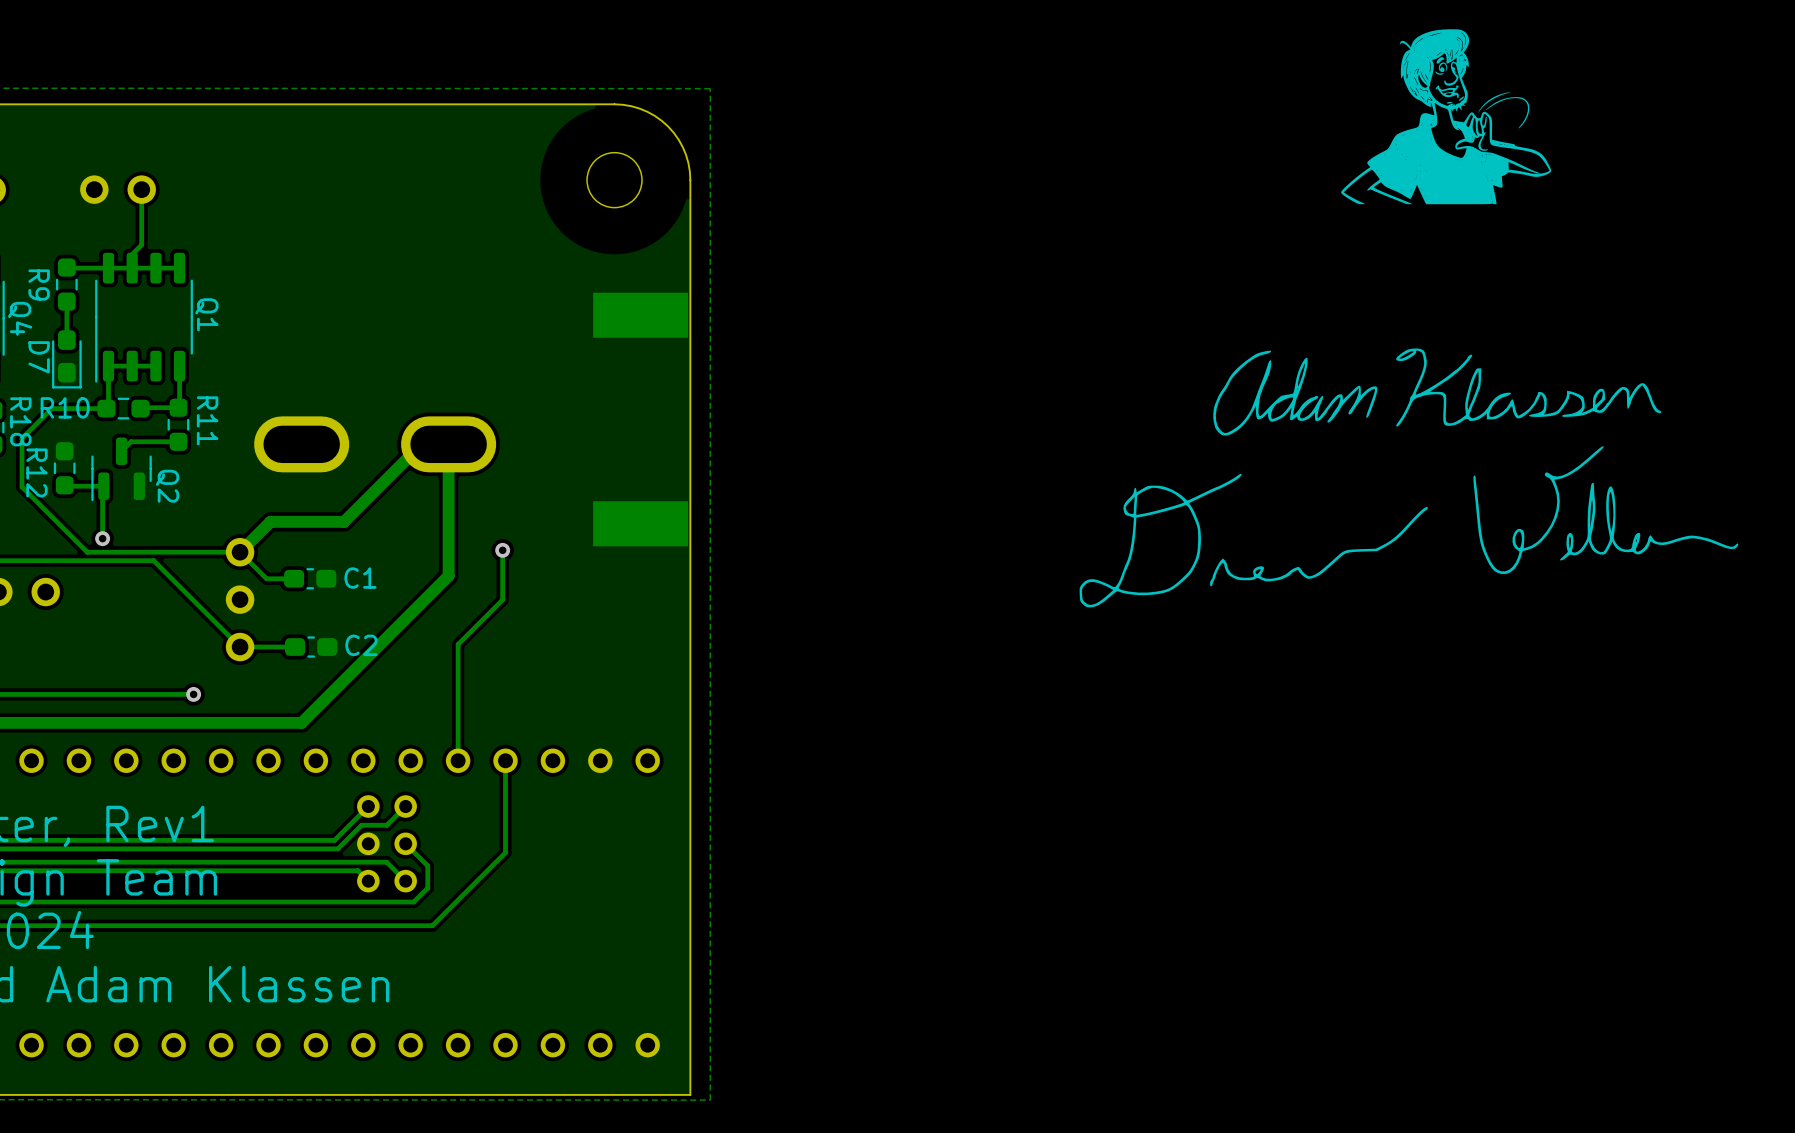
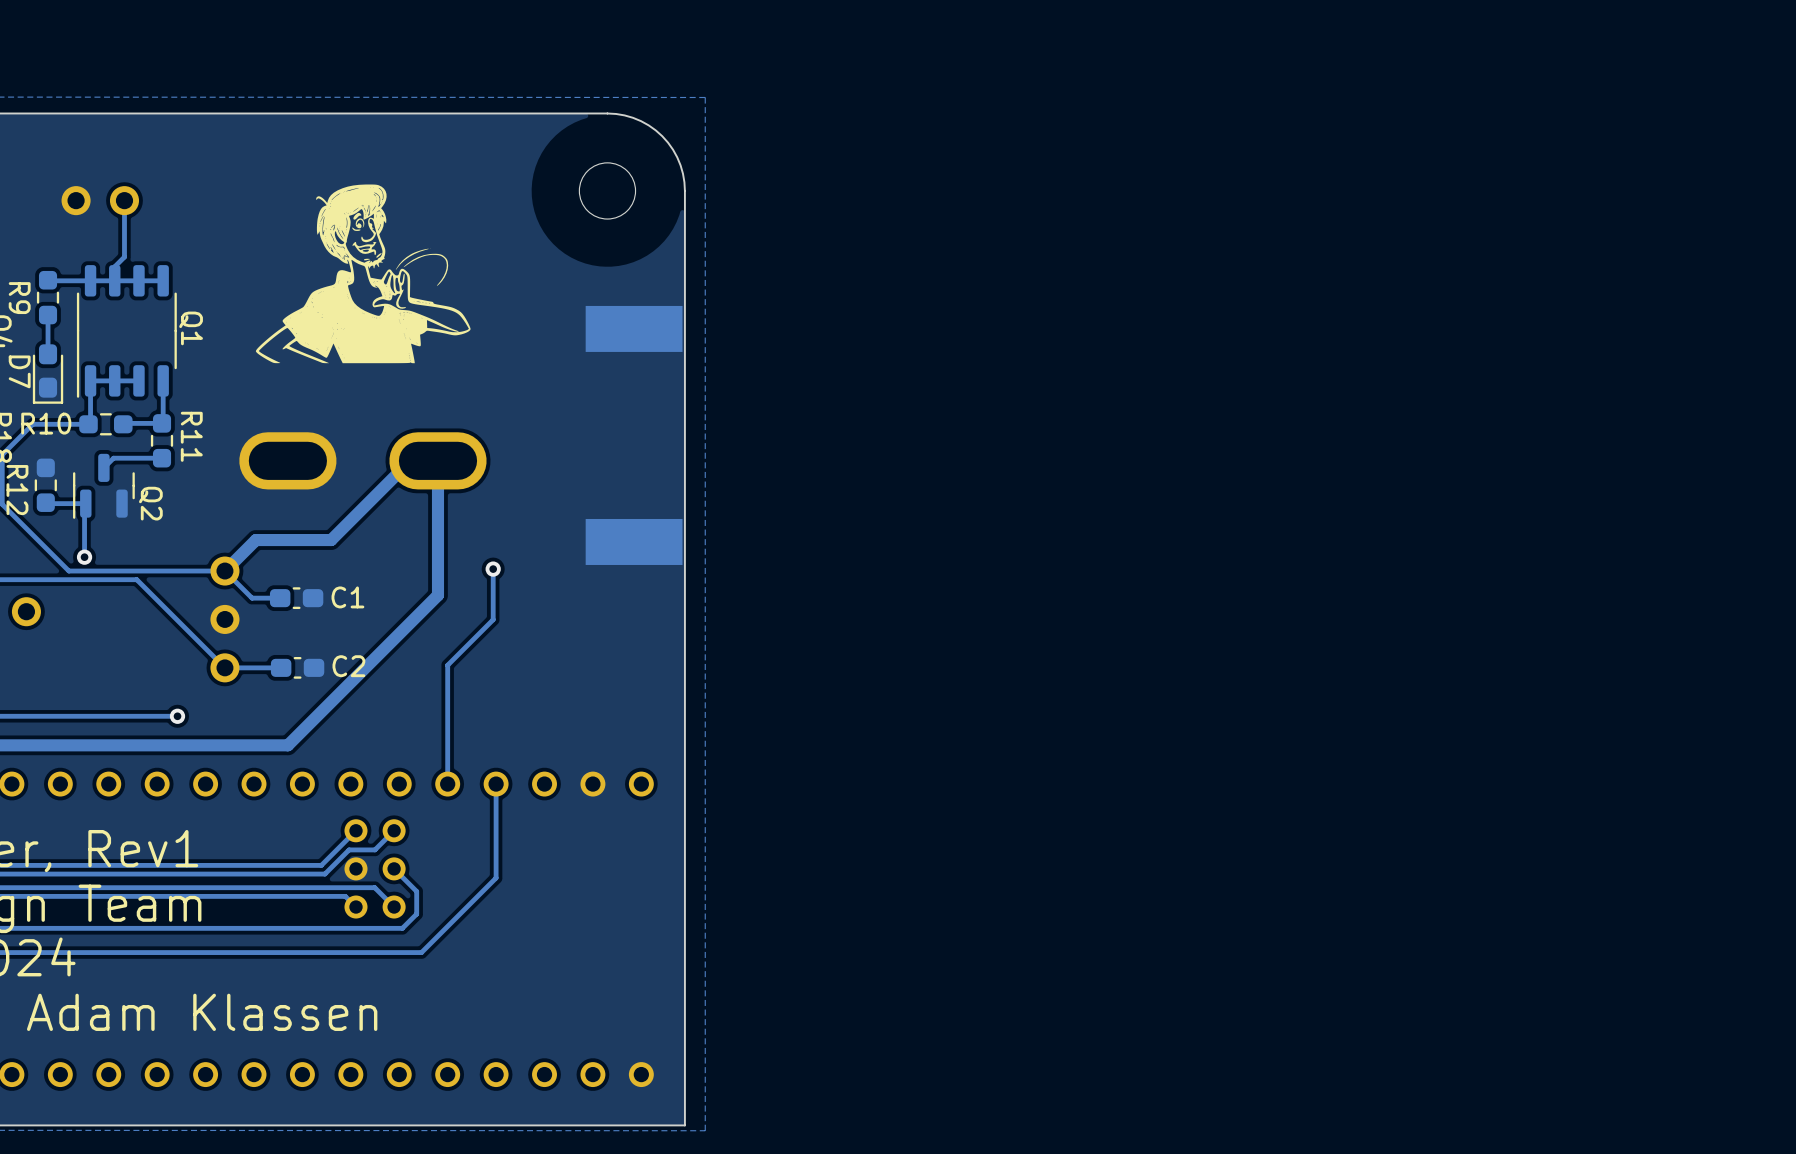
drawing: [1341, 29, 1552, 205] -> none
drawing: none -> [255, 184, 471, 364]
drawing: [1079, 348, 1739, 608] -> none

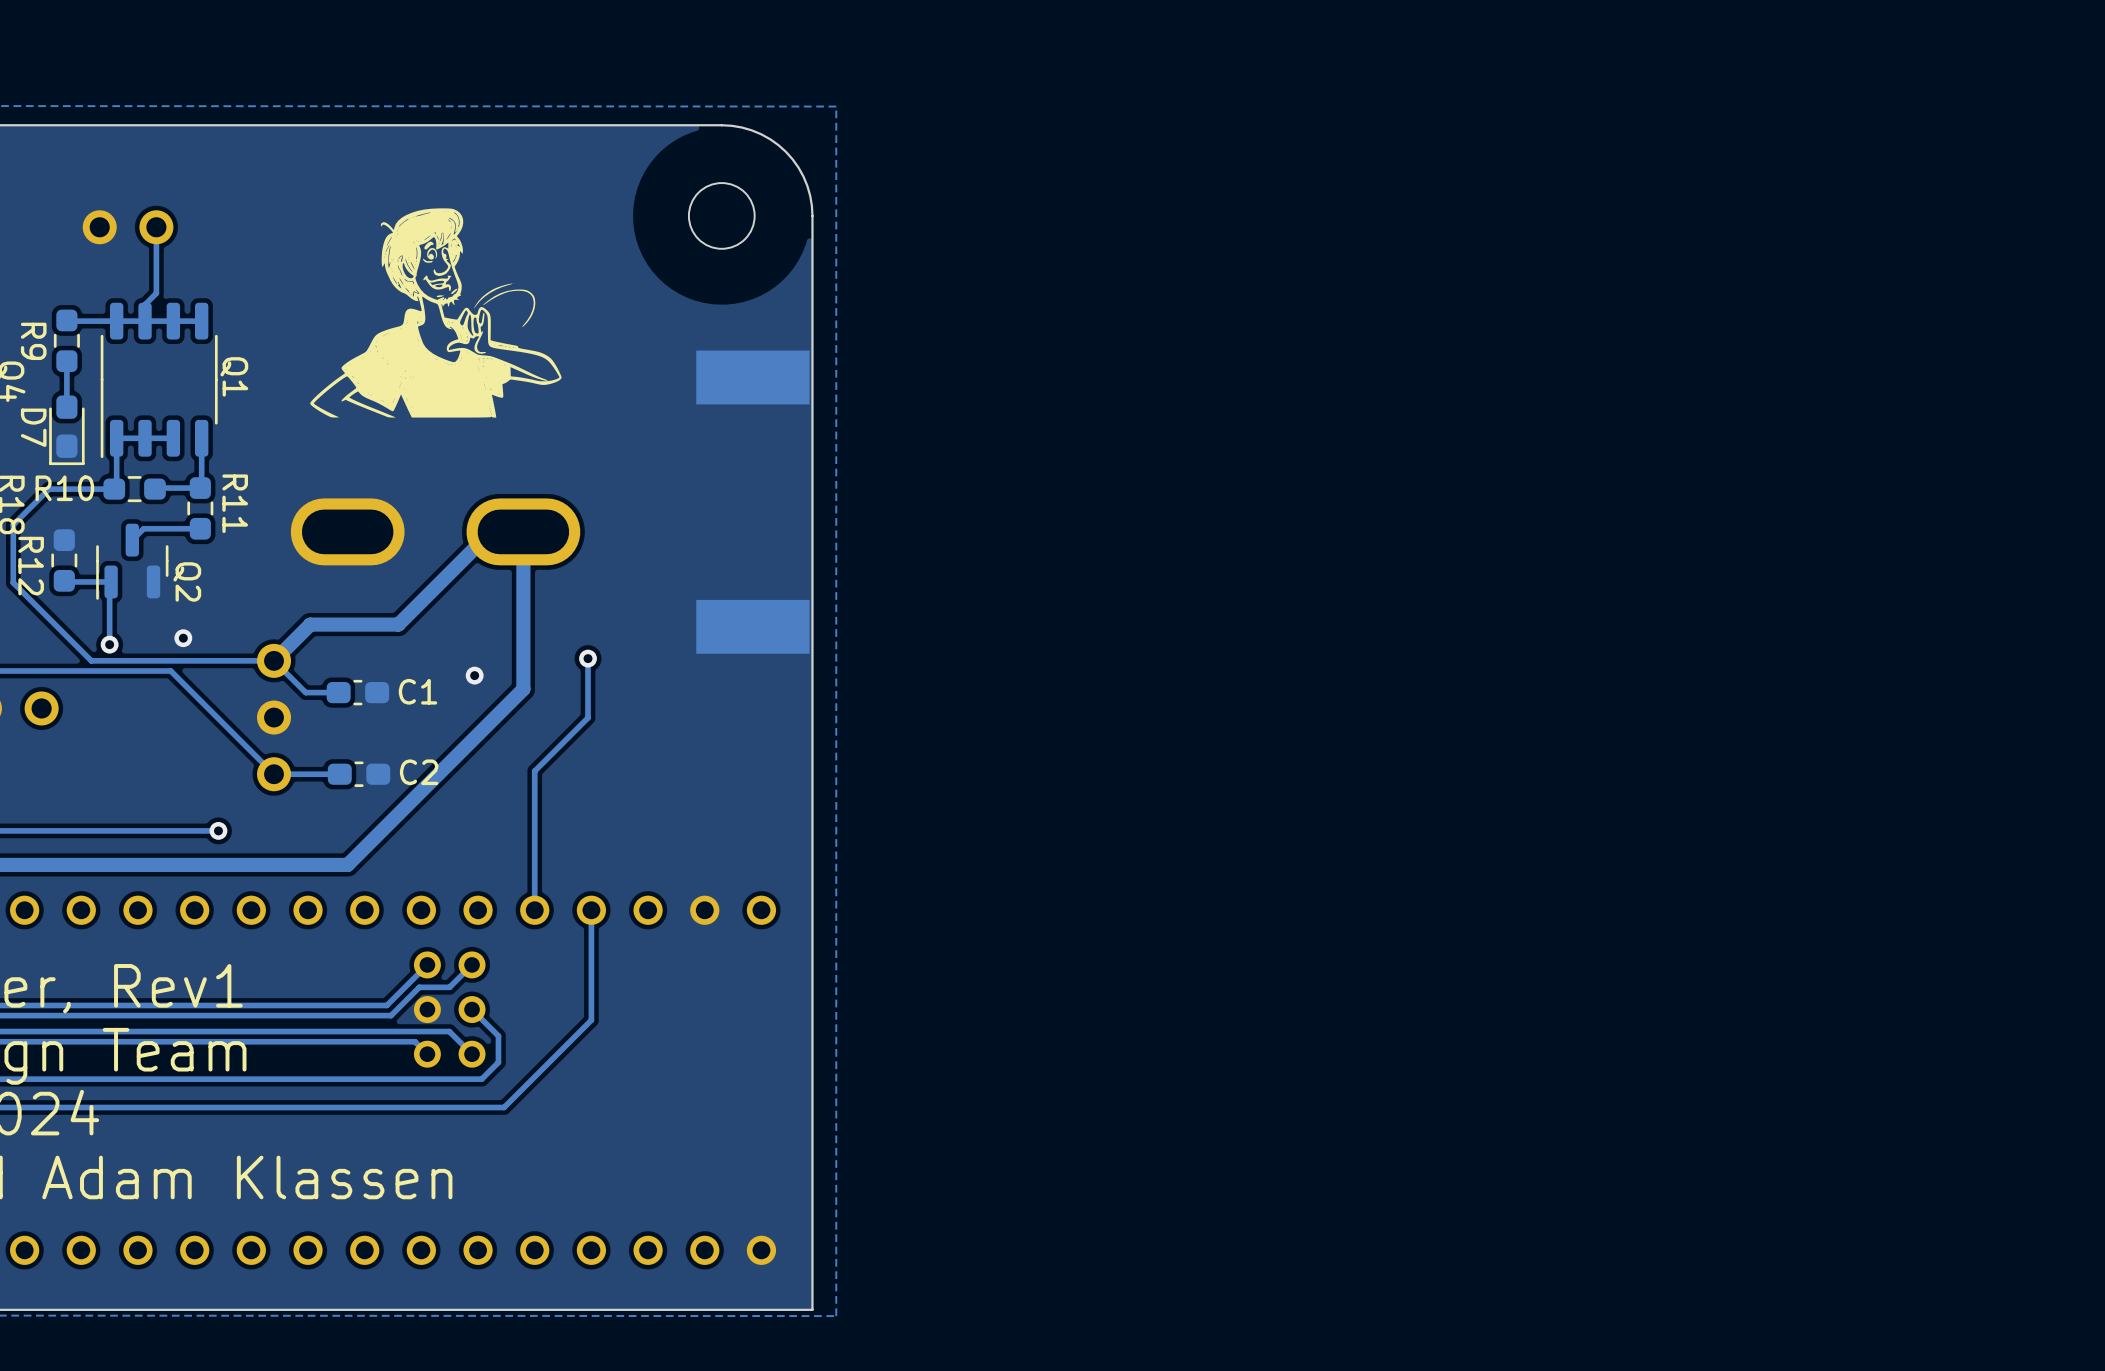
via: none -> (183, 638)
via: none -> (474, 675)

